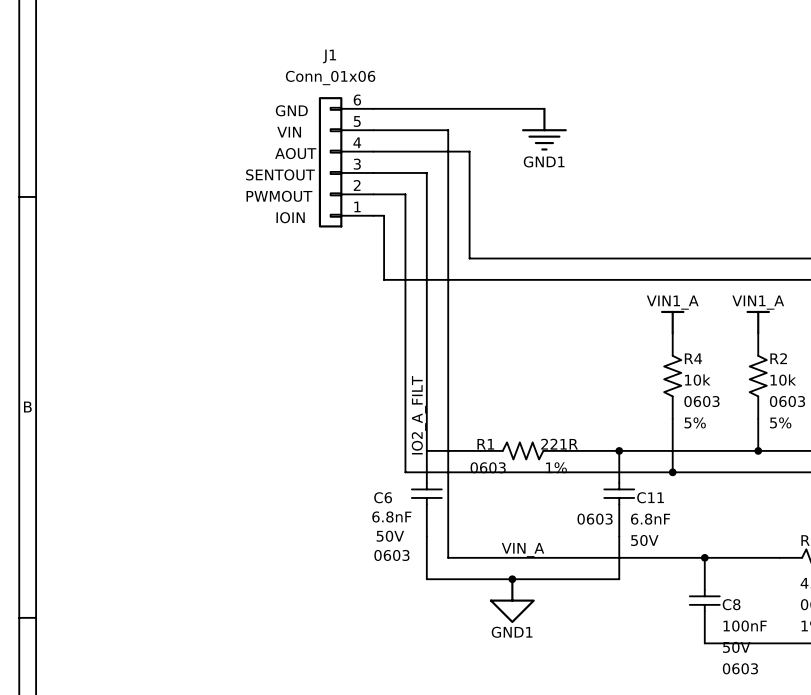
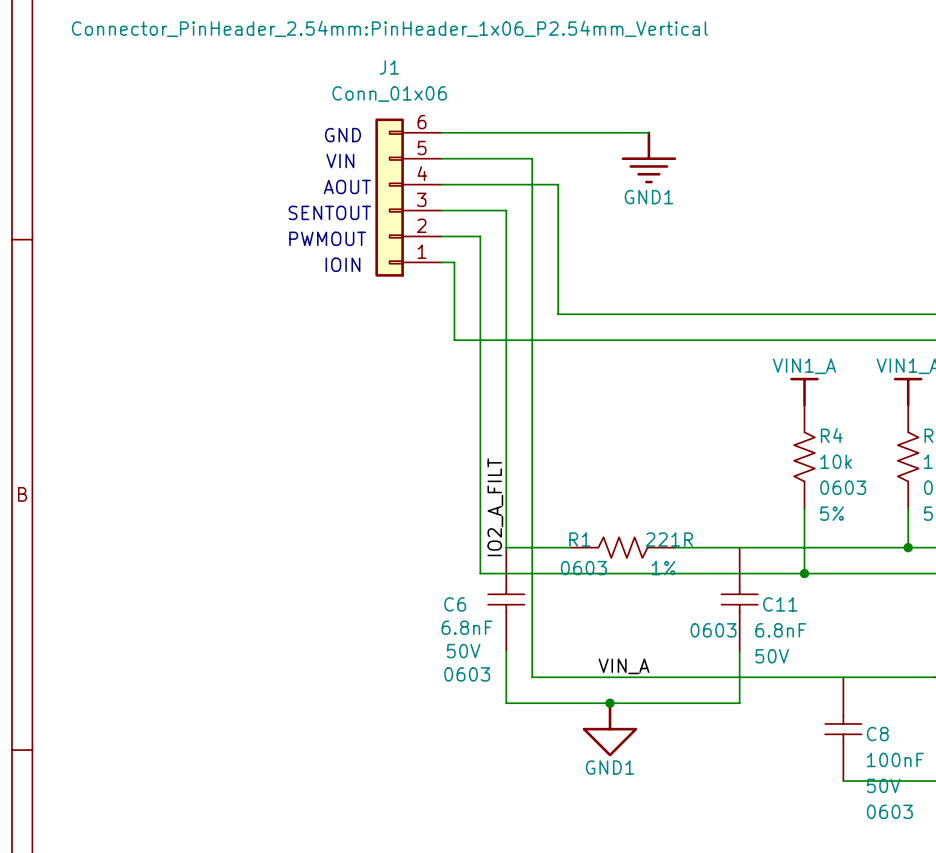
J1 text: none -> Connector_PinHeader_2.54mm:PinHeader_1x06_P2.54mm_Vertical (389, 28)
junction: (619, 450) -> none
junction: (704, 557) -> none

